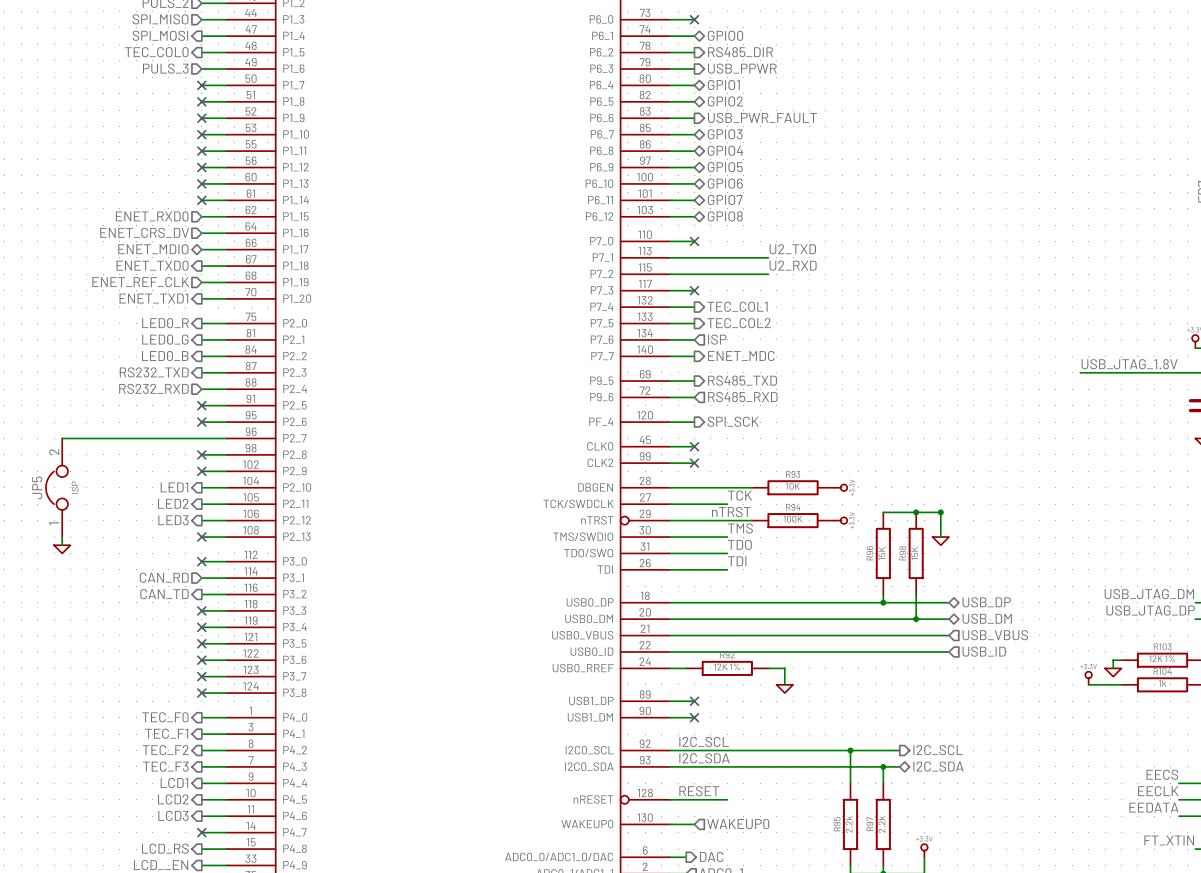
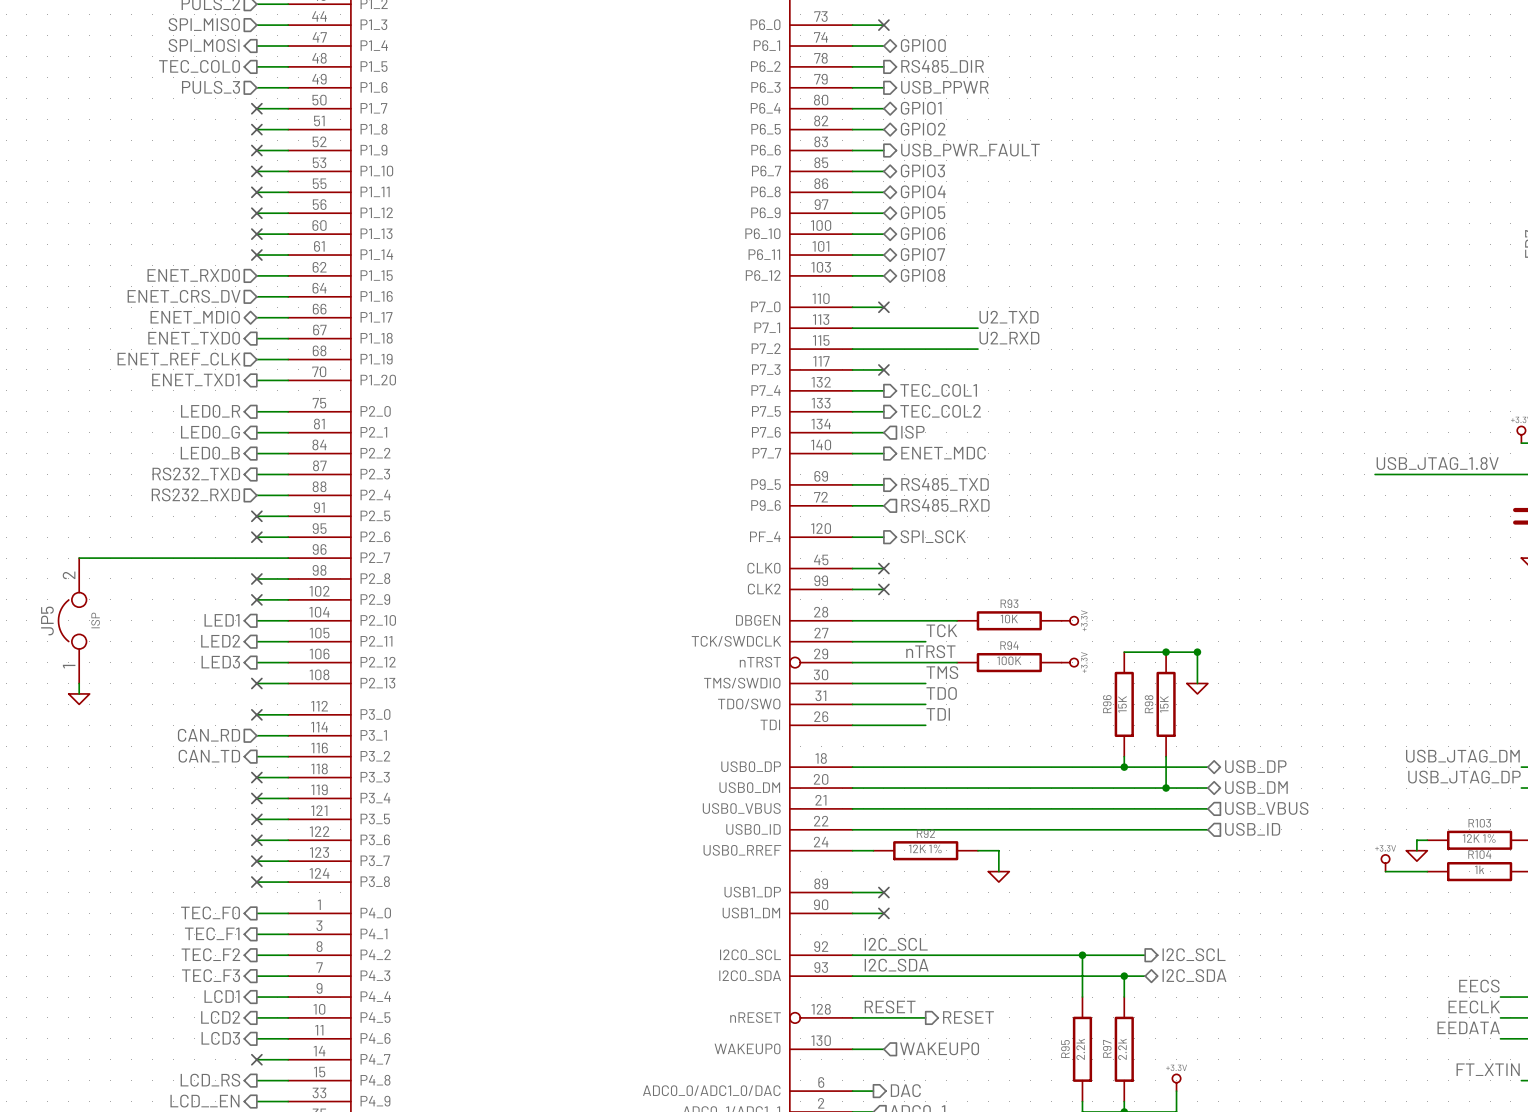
hierarchical label: none -> RESET (968, 1017)

